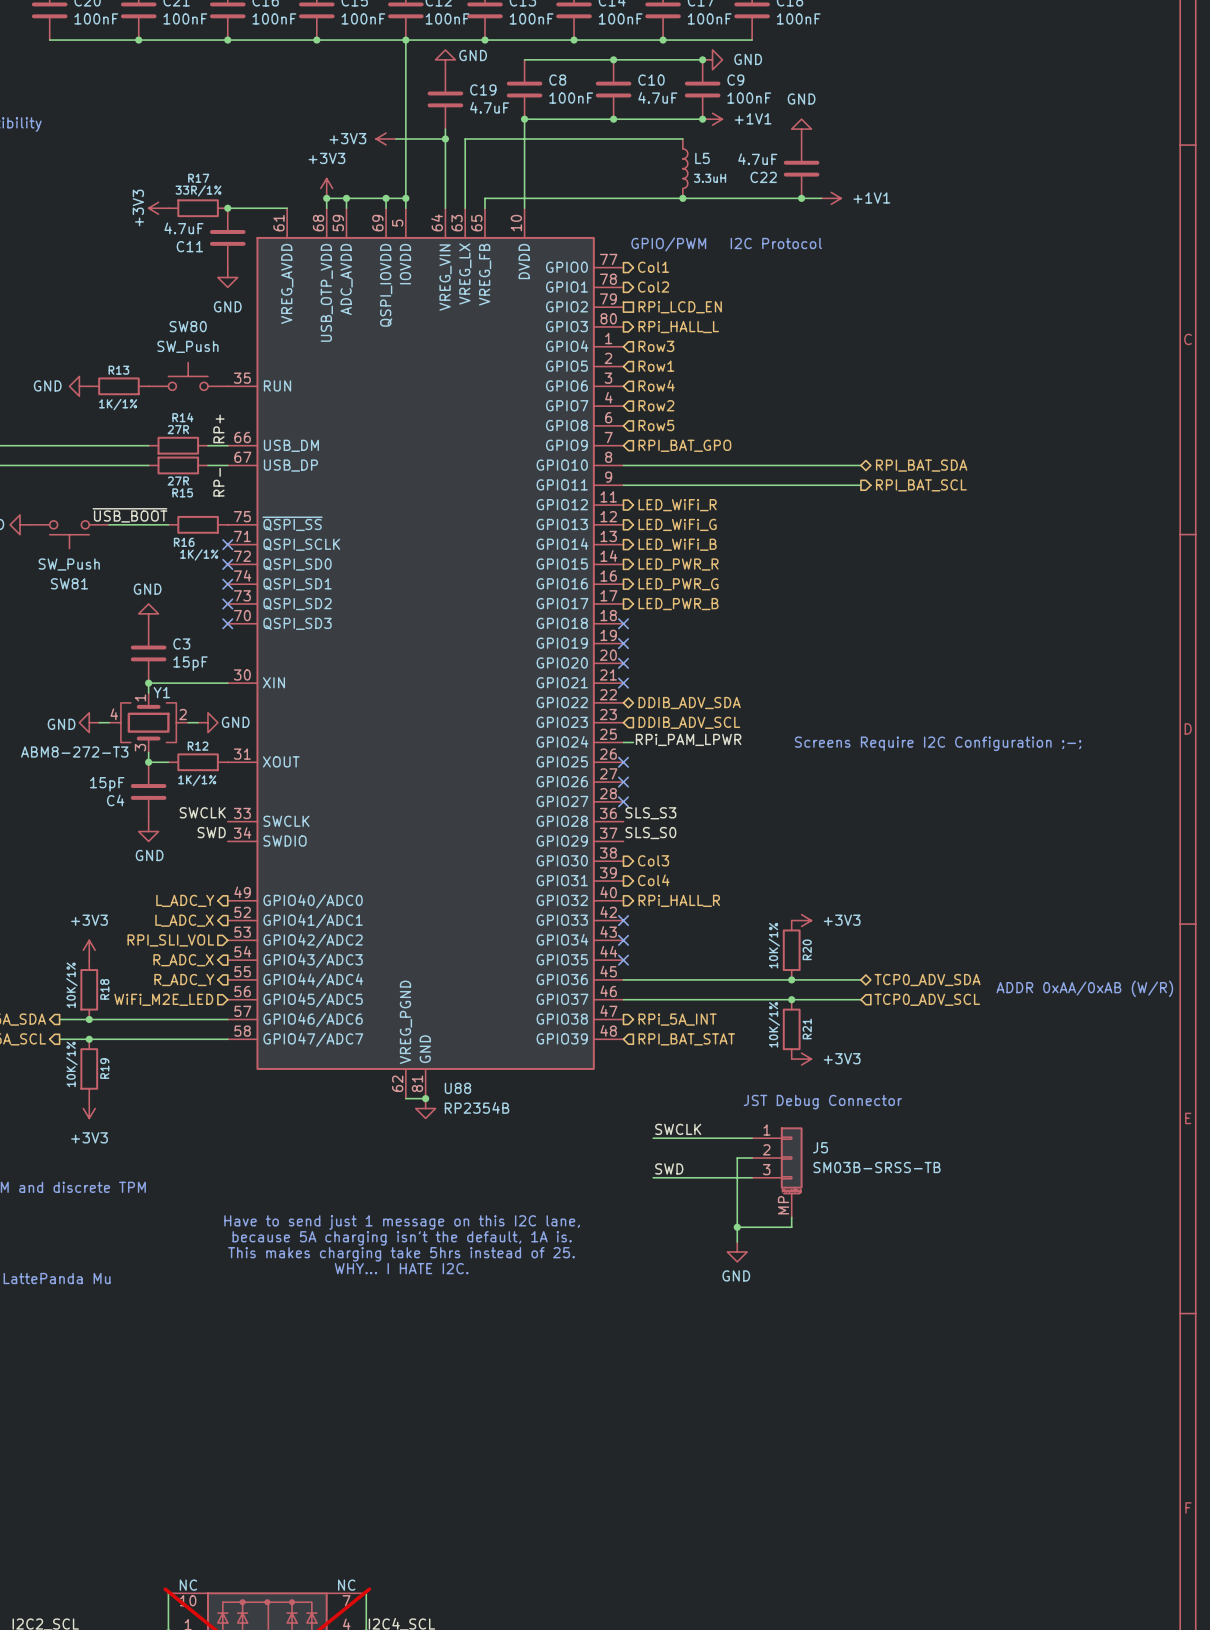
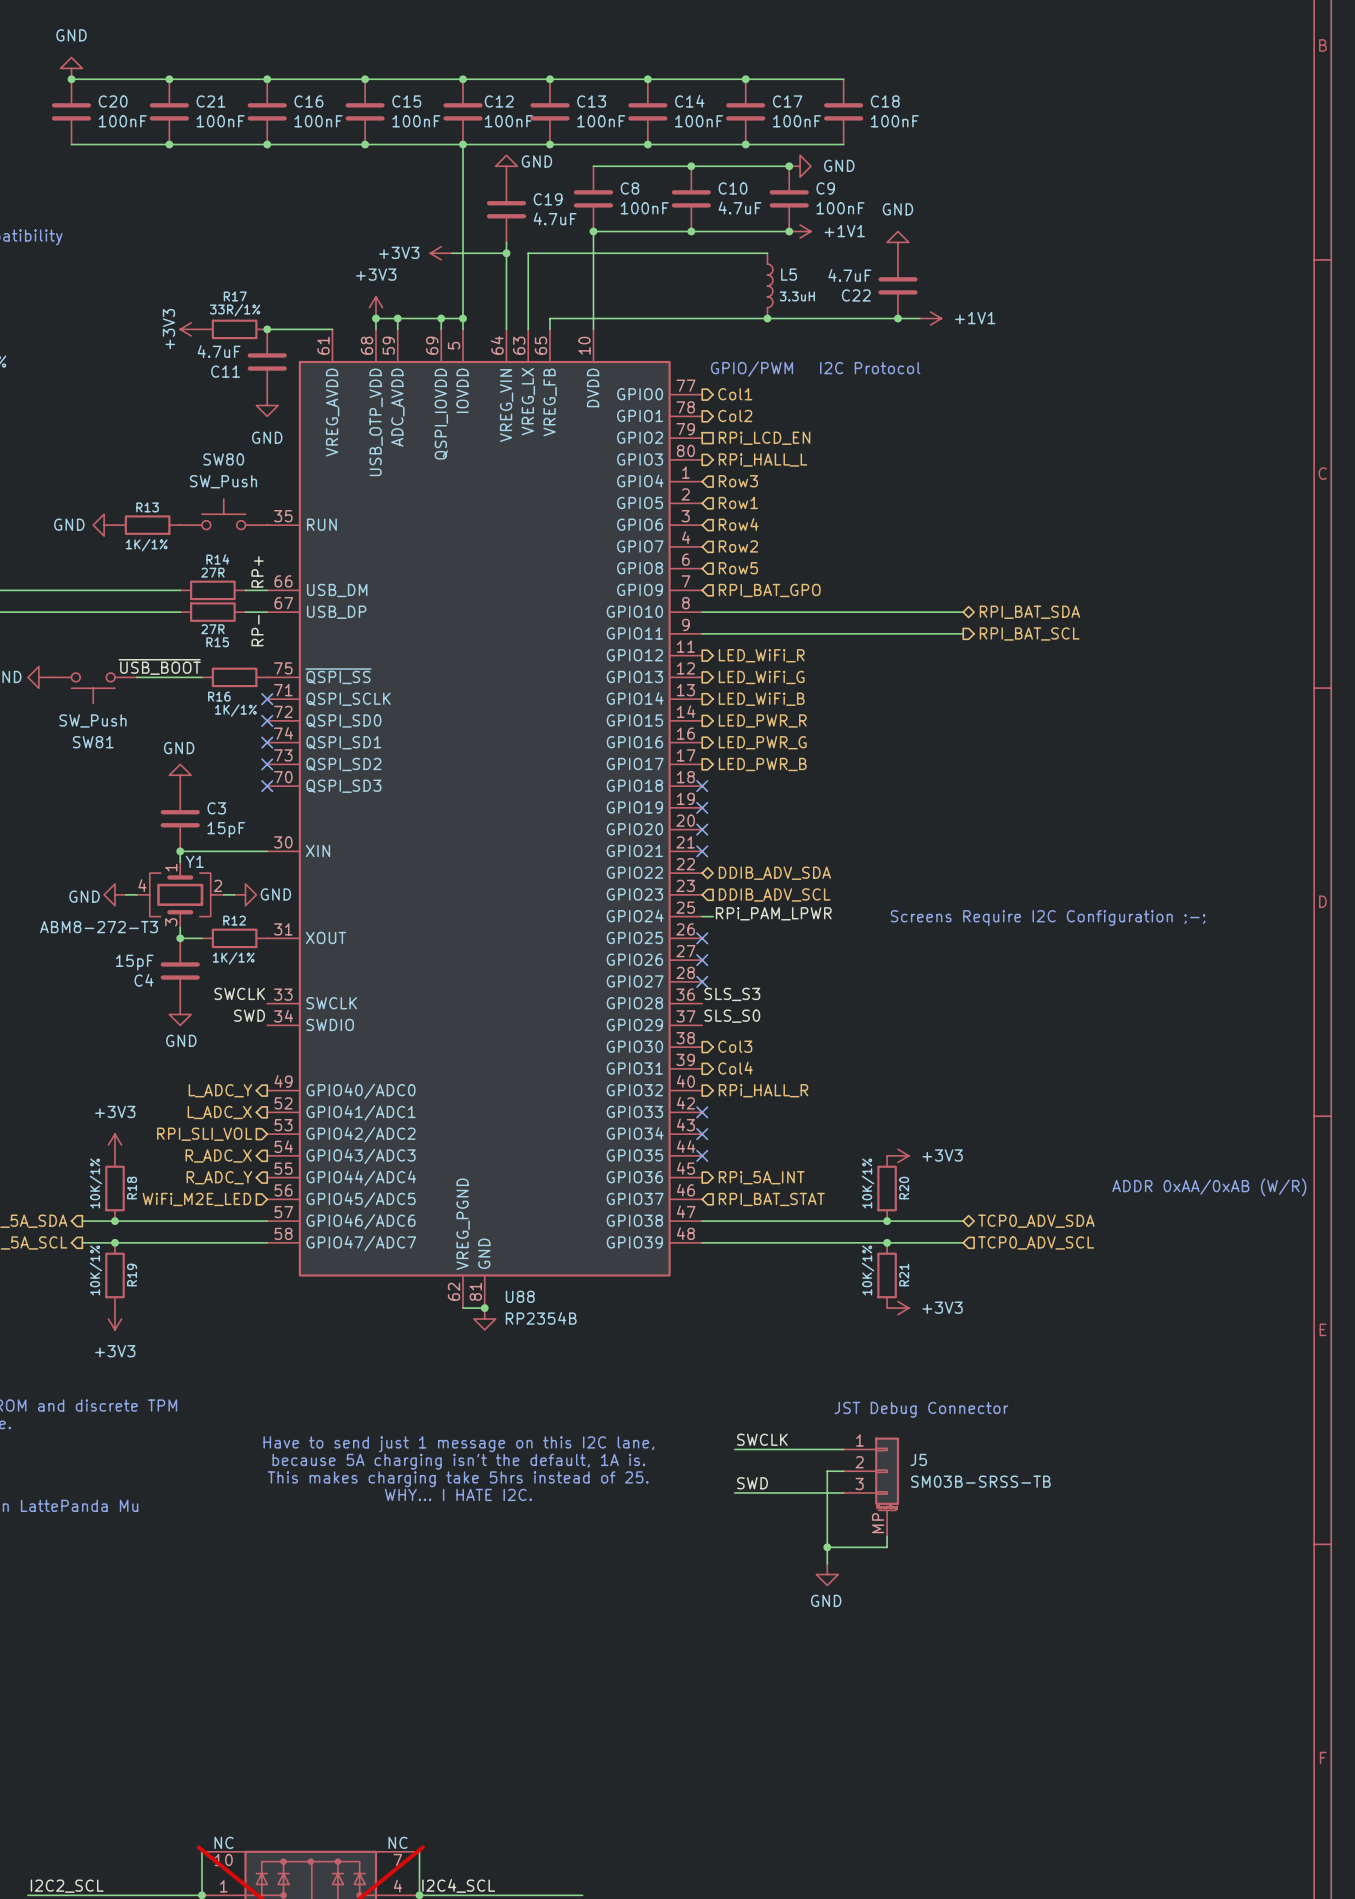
power symbol position: +3V3 (801, 920) -> +3V3 (897, 1155)
R20 position: (791, 950) -> (887, 1188)
wire: (623, 979) (860, 979) -> (702, 1221) (963, 1221)
junction: (791, 979) -> none
hierarchical label position: TCP0_ADV_SDA (927, 980) -> TCP0_ADV_SDA (1036, 1221)
wire: (623, 999) (860, 999) -> (702, 1242) (963, 1242)
junction: (791, 999) -> none
hierarchical label position: TCP0_ADV_SCL (927, 999) -> TCP0_ADV_SCL (1036, 1242)
hierarchical label position: RPi_5A_INT (677, 1019) -> RPi_5A_INT (761, 1177)
junction: none -> (887, 1221)
R21 position: (791, 1029) -> (887, 1275)
hierarchical label position: RPI_BAT_STAT (686, 1039) -> RPI_BAT_STAT (771, 1199)
junction: none -> (887, 1242)
power symbol position: +3V3 (801, 1059) -> +3V3 (897, 1308)
text position: JST Debug Connector (822, 1102) -> JST Debug Connector (921, 1409)
label position: SWCLK (678, 1129) -> SWCLK (762, 1439)
wire: (653, 1138) (752, 1138) -> none
wire: (752, 1158) (737, 1158) (737, 1242) -> (843, 1471) (827, 1471) (827, 1563)
label position: SWD (669, 1168) -> SWD (752, 1483)
J5 position: (777, 1172) -> (871, 1486)
wire: (653, 1177) (752, 1177) -> (734, 1492) (843, 1492)
wire: none -> (734, 1449) (827, 1449)
junction: (737, 1227) -> none
power symbol position: GND (737, 1251) -> GND (827, 1574)
wire: none -> (887, 1536) (887, 1547) (827, 1547)
junction: none -> (827, 1547)

